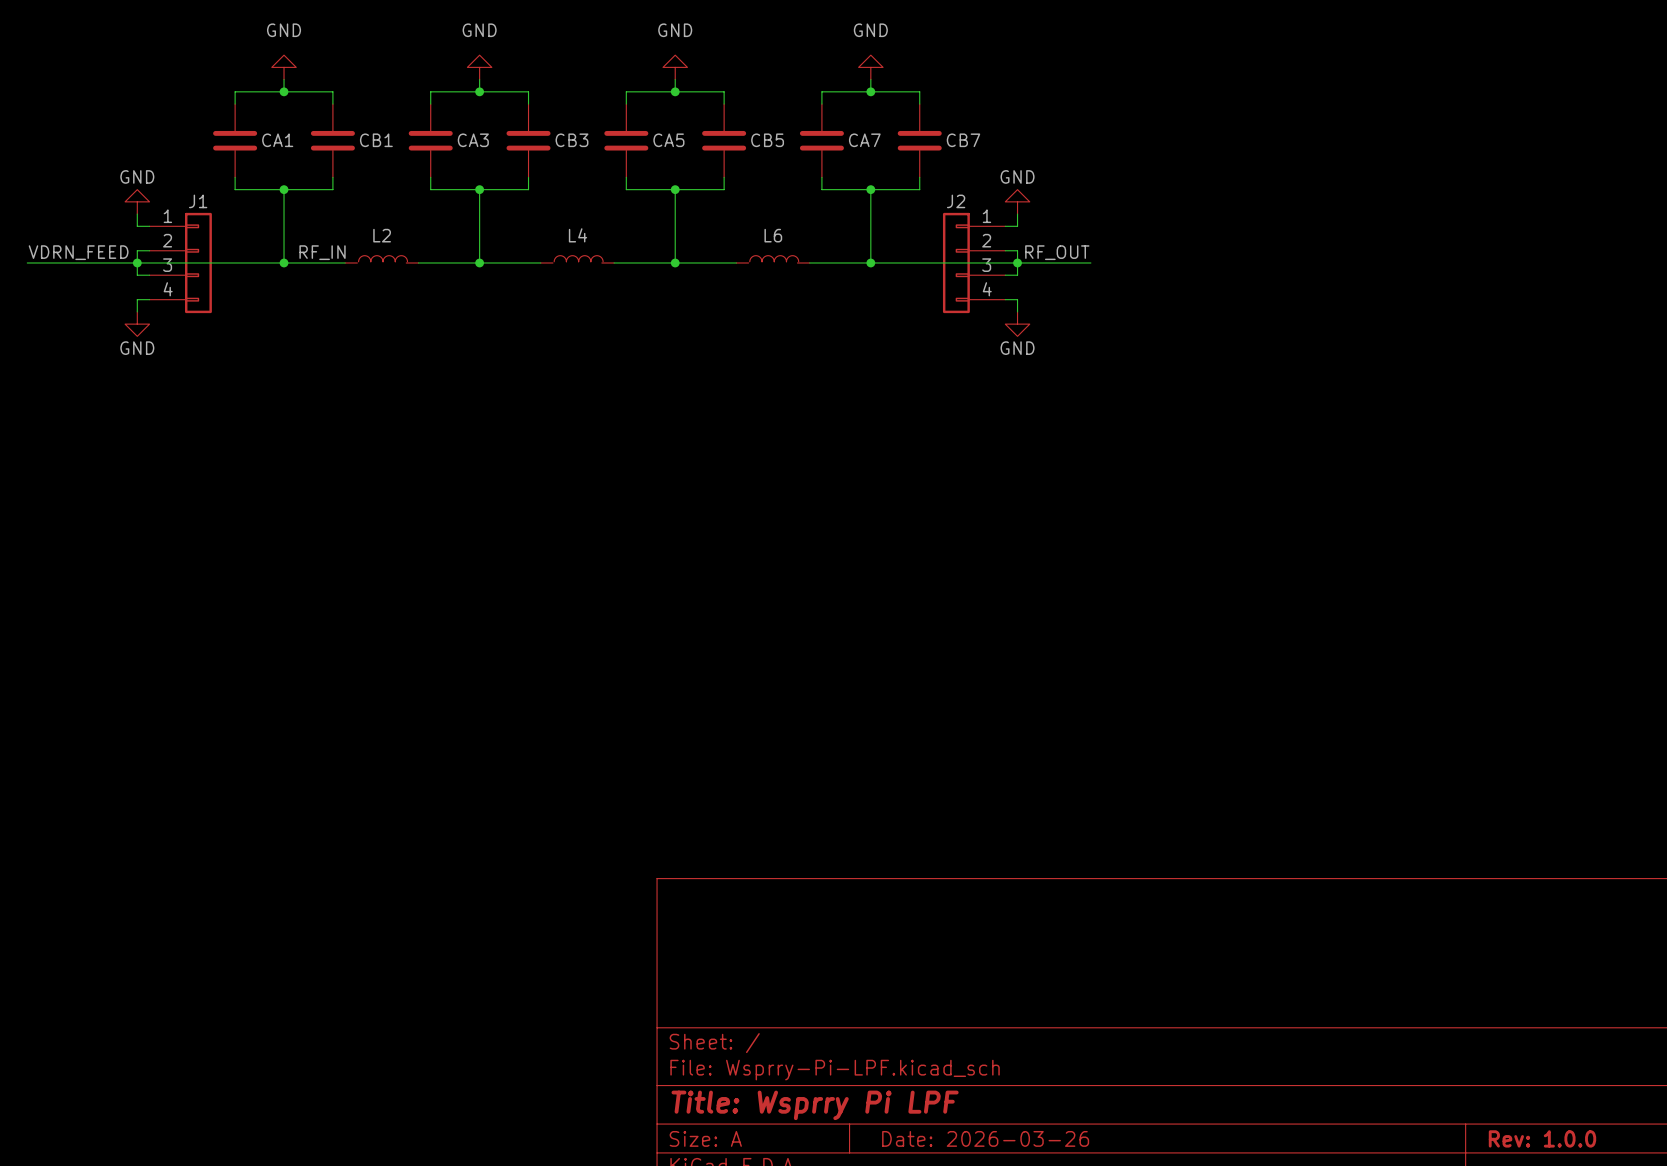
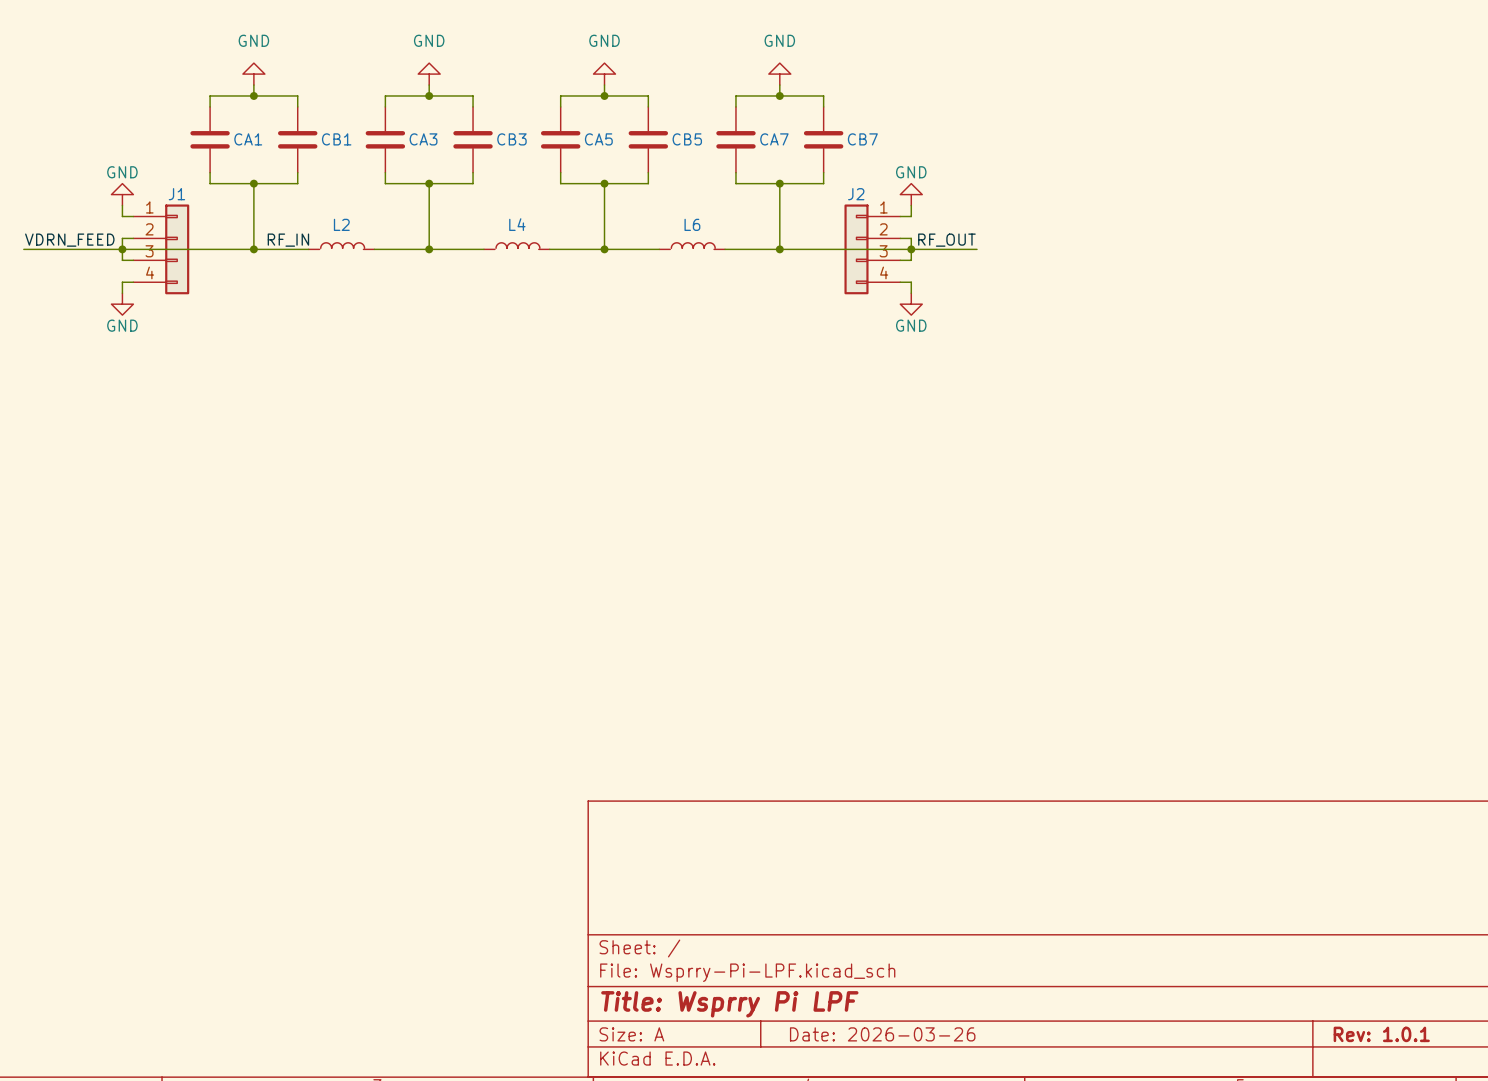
title block: Rev: 1.0.0 (1542, 1138) -> Rev: 1.0.1 (1381, 1034)

